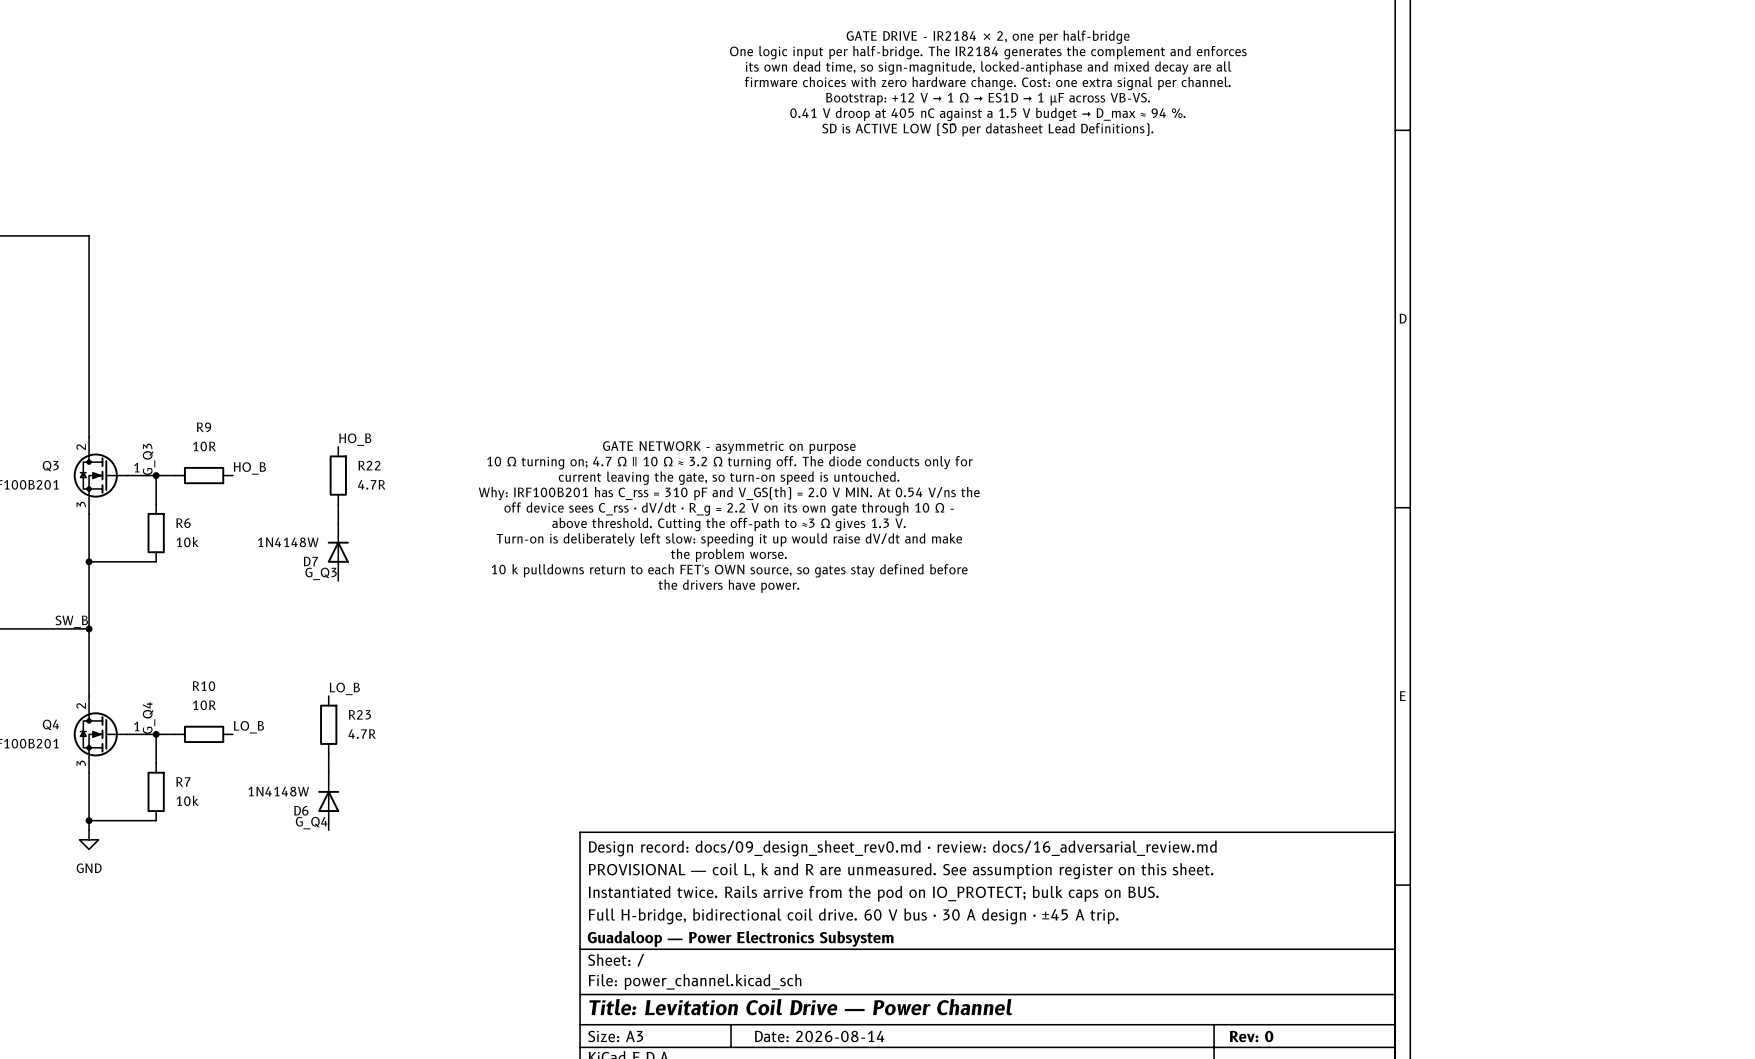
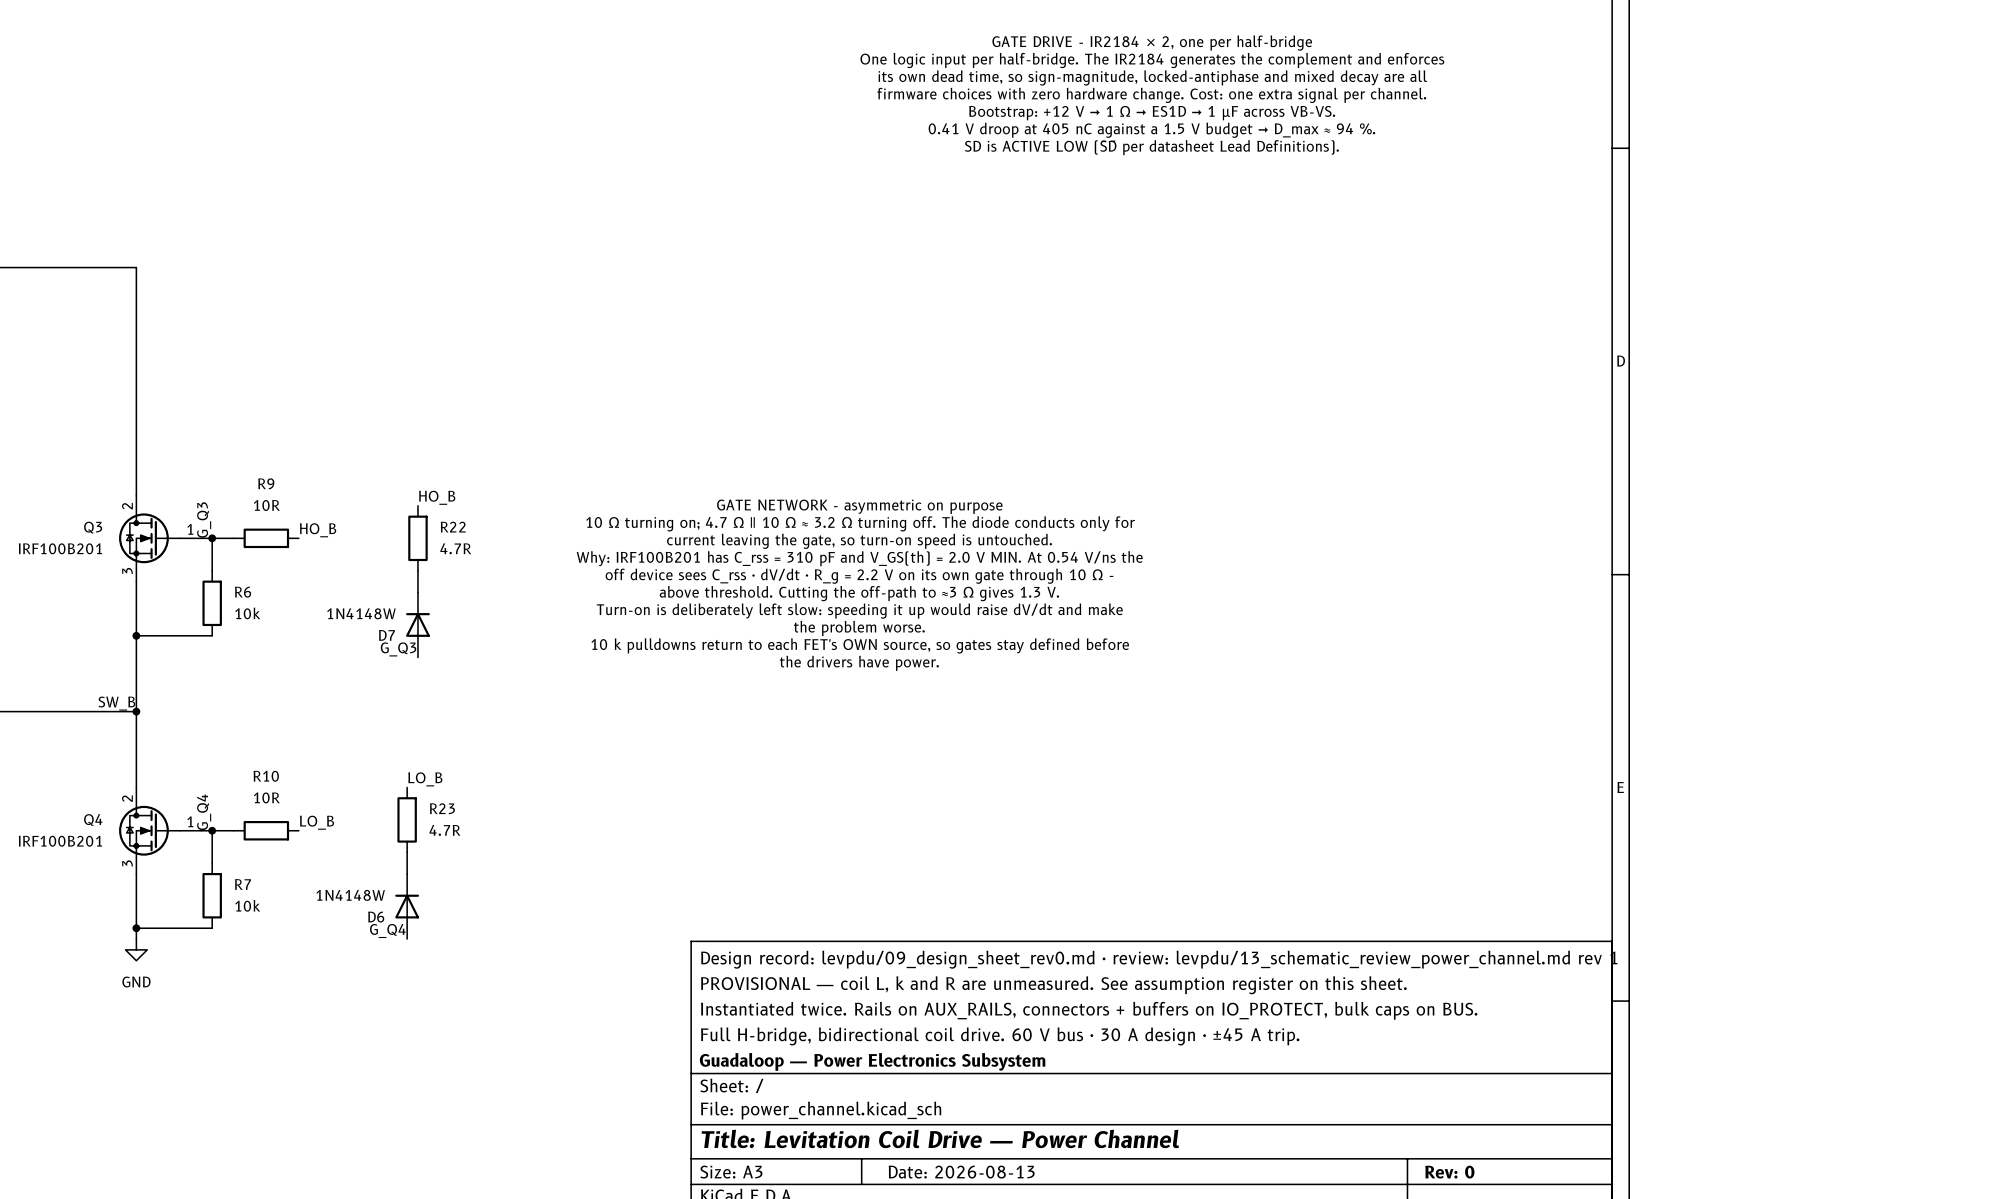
title block: Design record: docs/09_design_sheet_rev0.md · review: docs/16_adversarial_review.md (902, 848) -> Design record: levpdu/09_design_sheet_rev0.md · review: levpdu/13_schematic_review_power_channel.md rev 1 (1159, 959)
title block: Instantiated twice. Rails arrive from the pod on IO_PROTECT; bulk caps on BUS. (873, 893) -> Instantiated twice. Rails on AUX_RAILS, connectors + buffers on IO_PROTECT, bulk caps on BUS. (1089, 1010)
title block: Date: 2026-08-14 (819, 1036) -> Date: 2026-08-13 (961, 1172)

